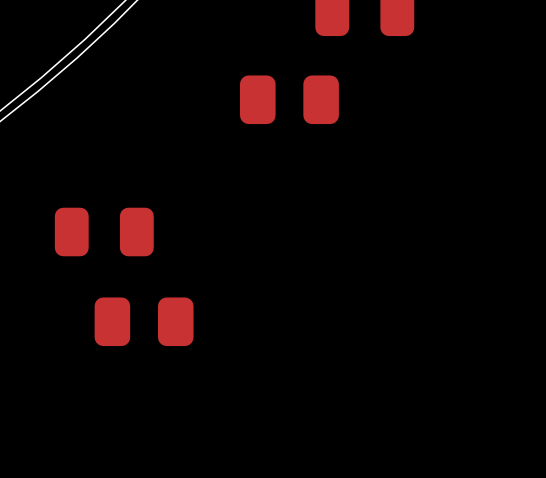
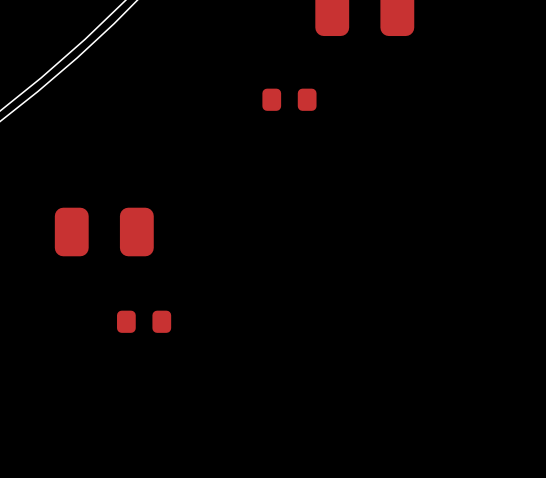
part footprint: [239, 75, 339, 125] -> [262, 88, 317, 111]
part footprint: [94, 297, 194, 347] -> [117, 310, 172, 333]

